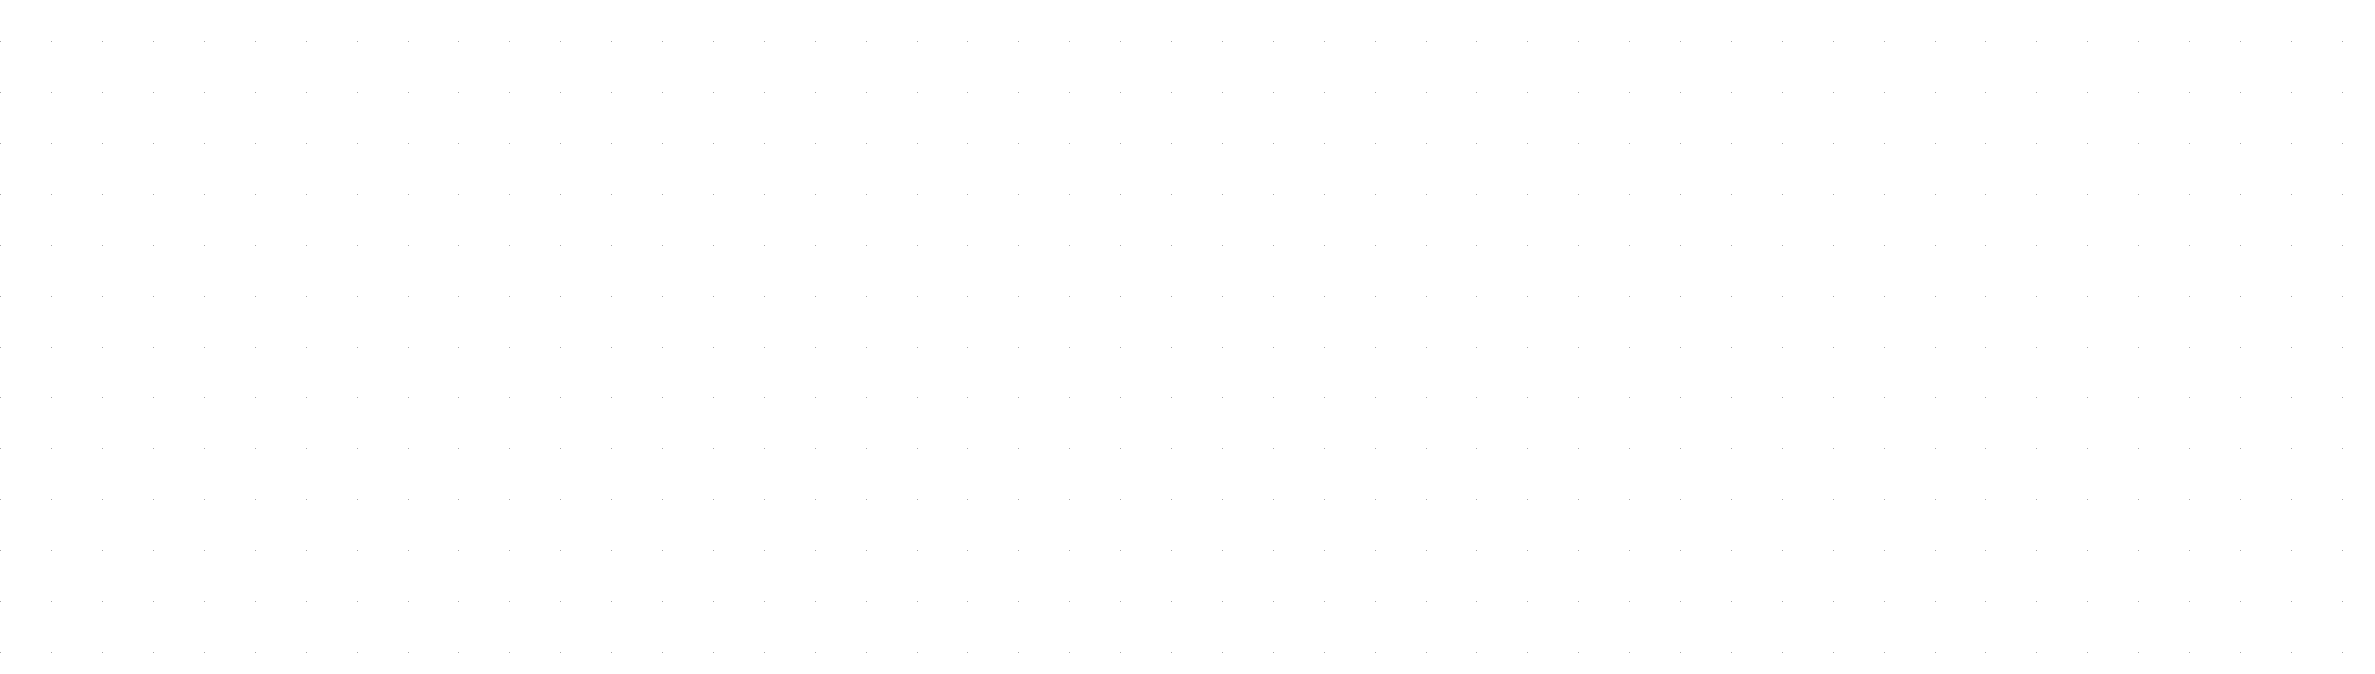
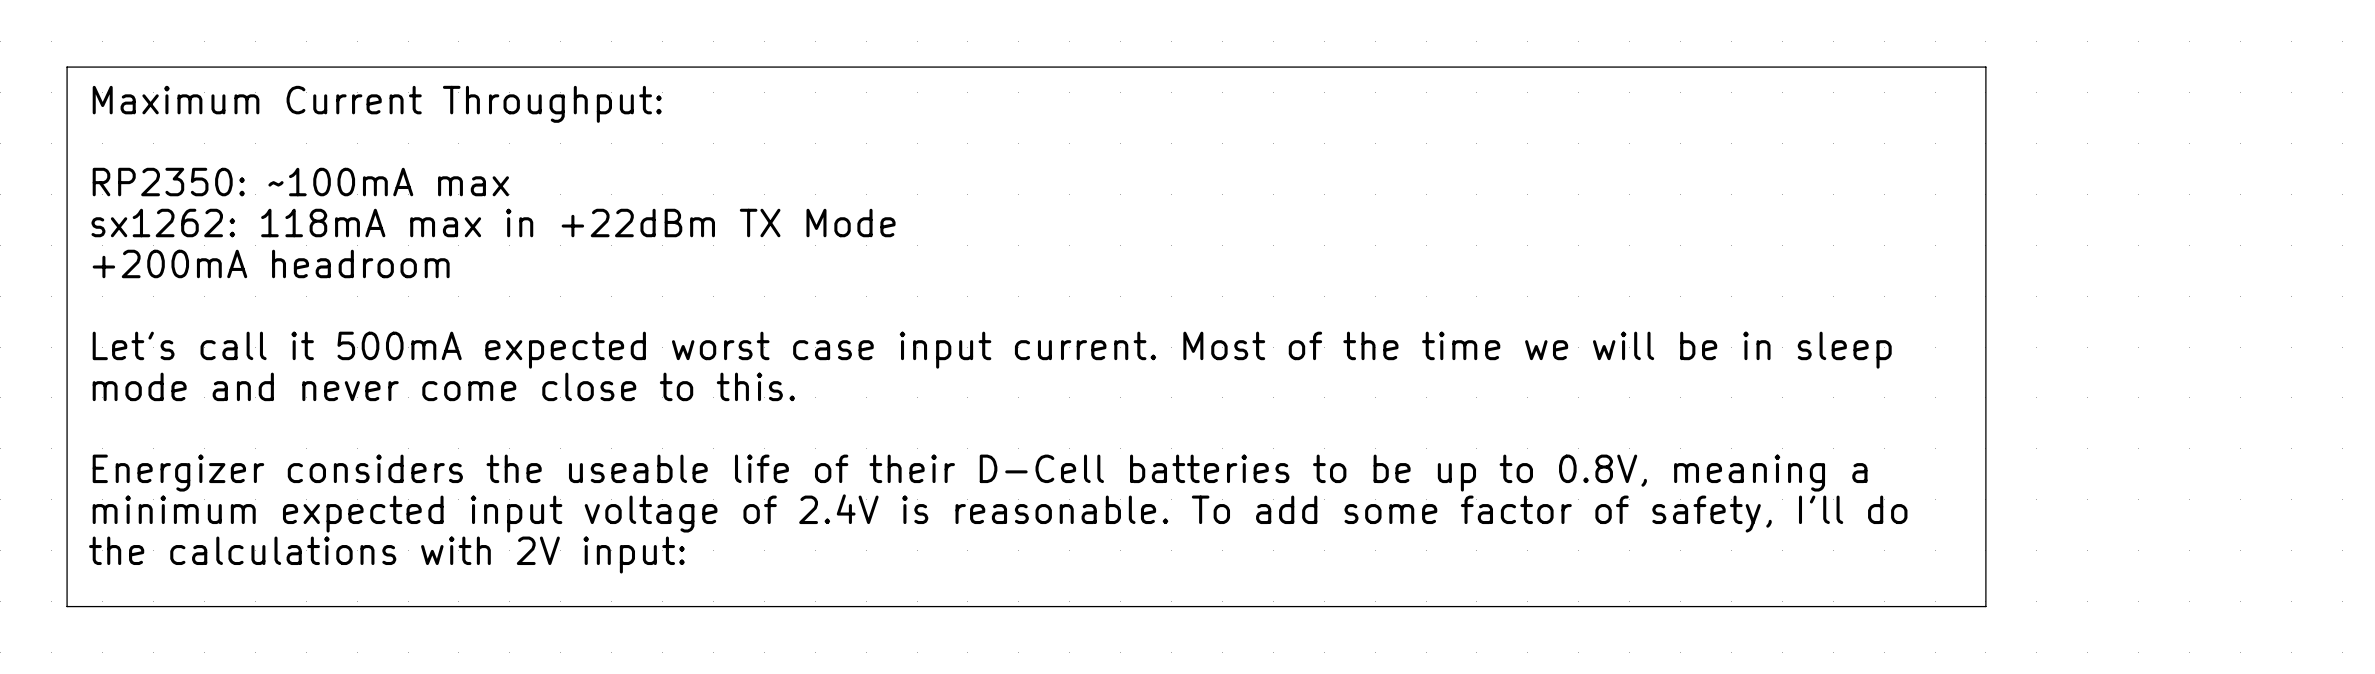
line: none -> (67, 67) (1985, 67) (1985, 606) (67, 606) (67, 67)
text: none -> Maximum Current Throughput: (377, 104)
text: none -> RP2350: ~100mA max (300, 182)
text: none -> sx1262: 118mA max in +22dBm TX Mode (493, 223)
text: none -> +200mA headroom (271, 263)
text: none -> Let's call it 500mA expected worst case input current. Most of the time we will be in sleep (992, 350)
text: none -> mode and never come close to this. (443, 386)
text: none -> Energizer considers the useable life of their D-Cell batteries to be up to 0.8V, meaning a (980, 473)
text: none -> minimum expected input voltage of 2.4V is reasonable. To add some factor of safety, I'll do (1000, 513)
text: none -> the calculations with 2V input: (386, 555)

